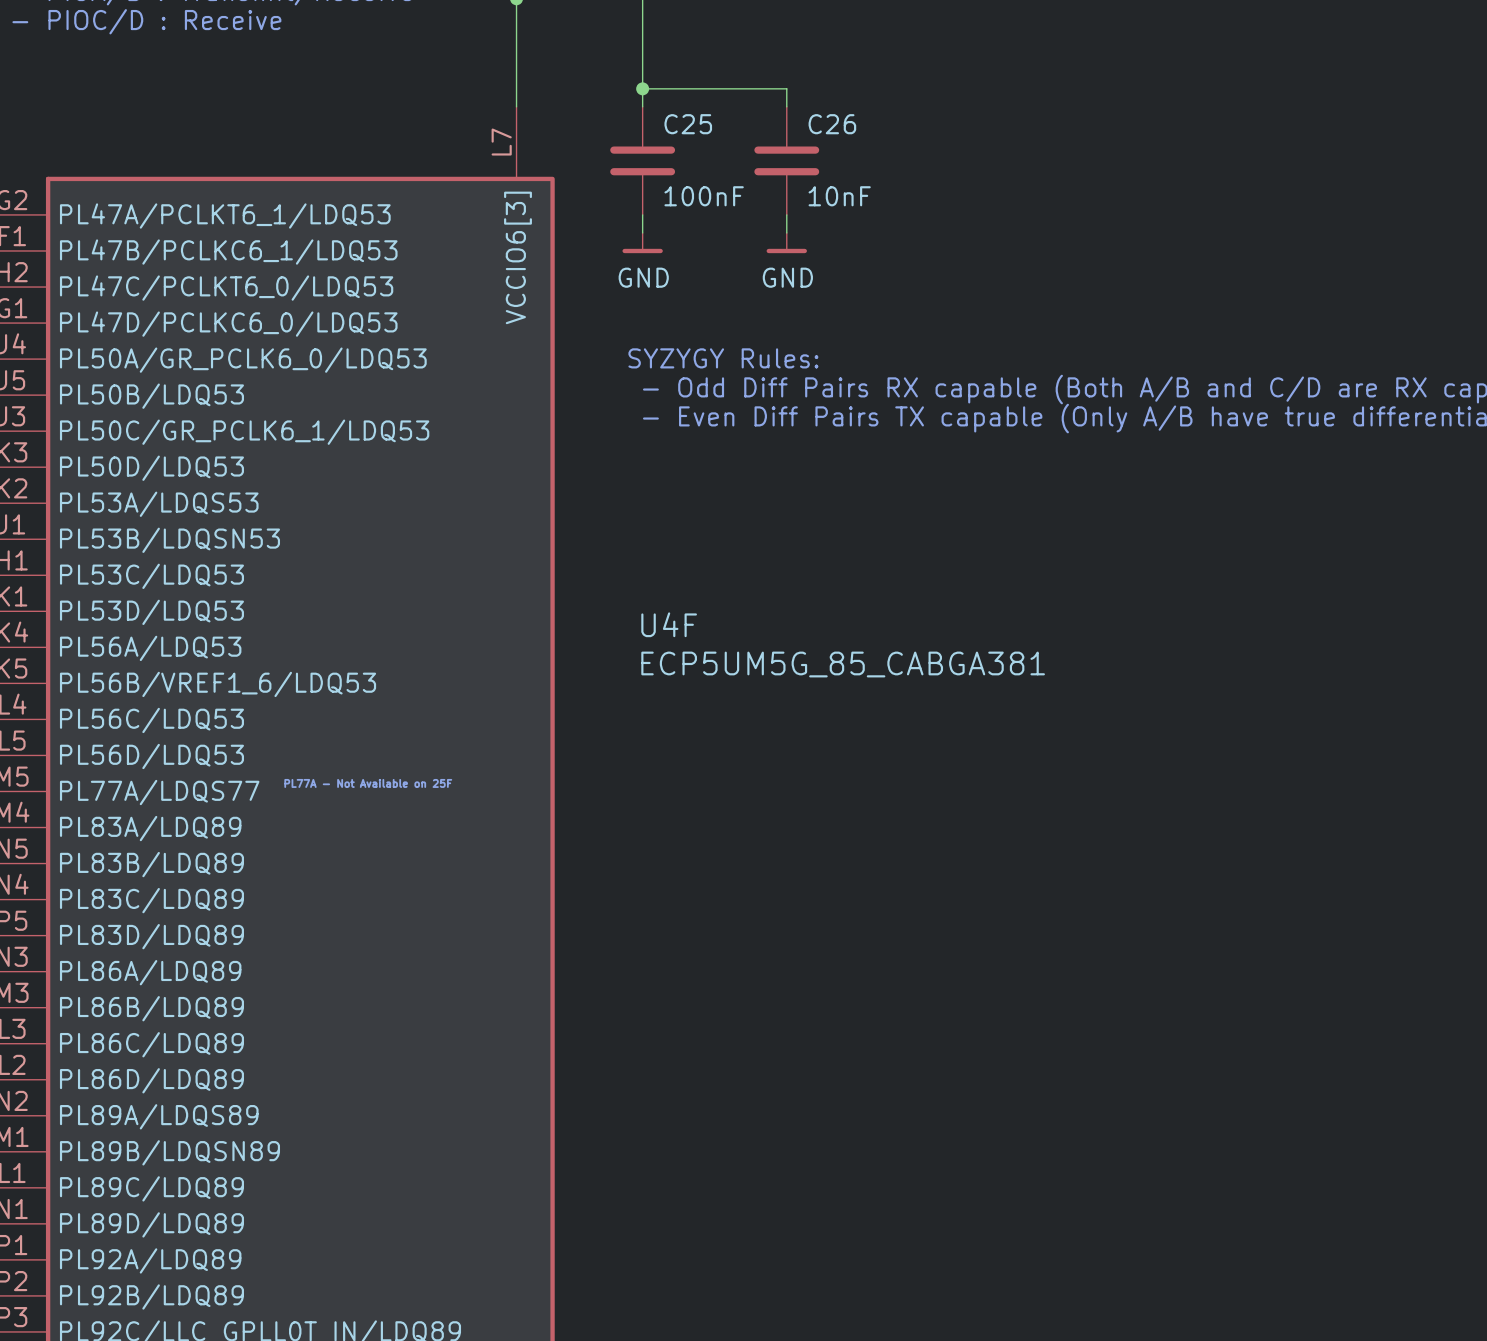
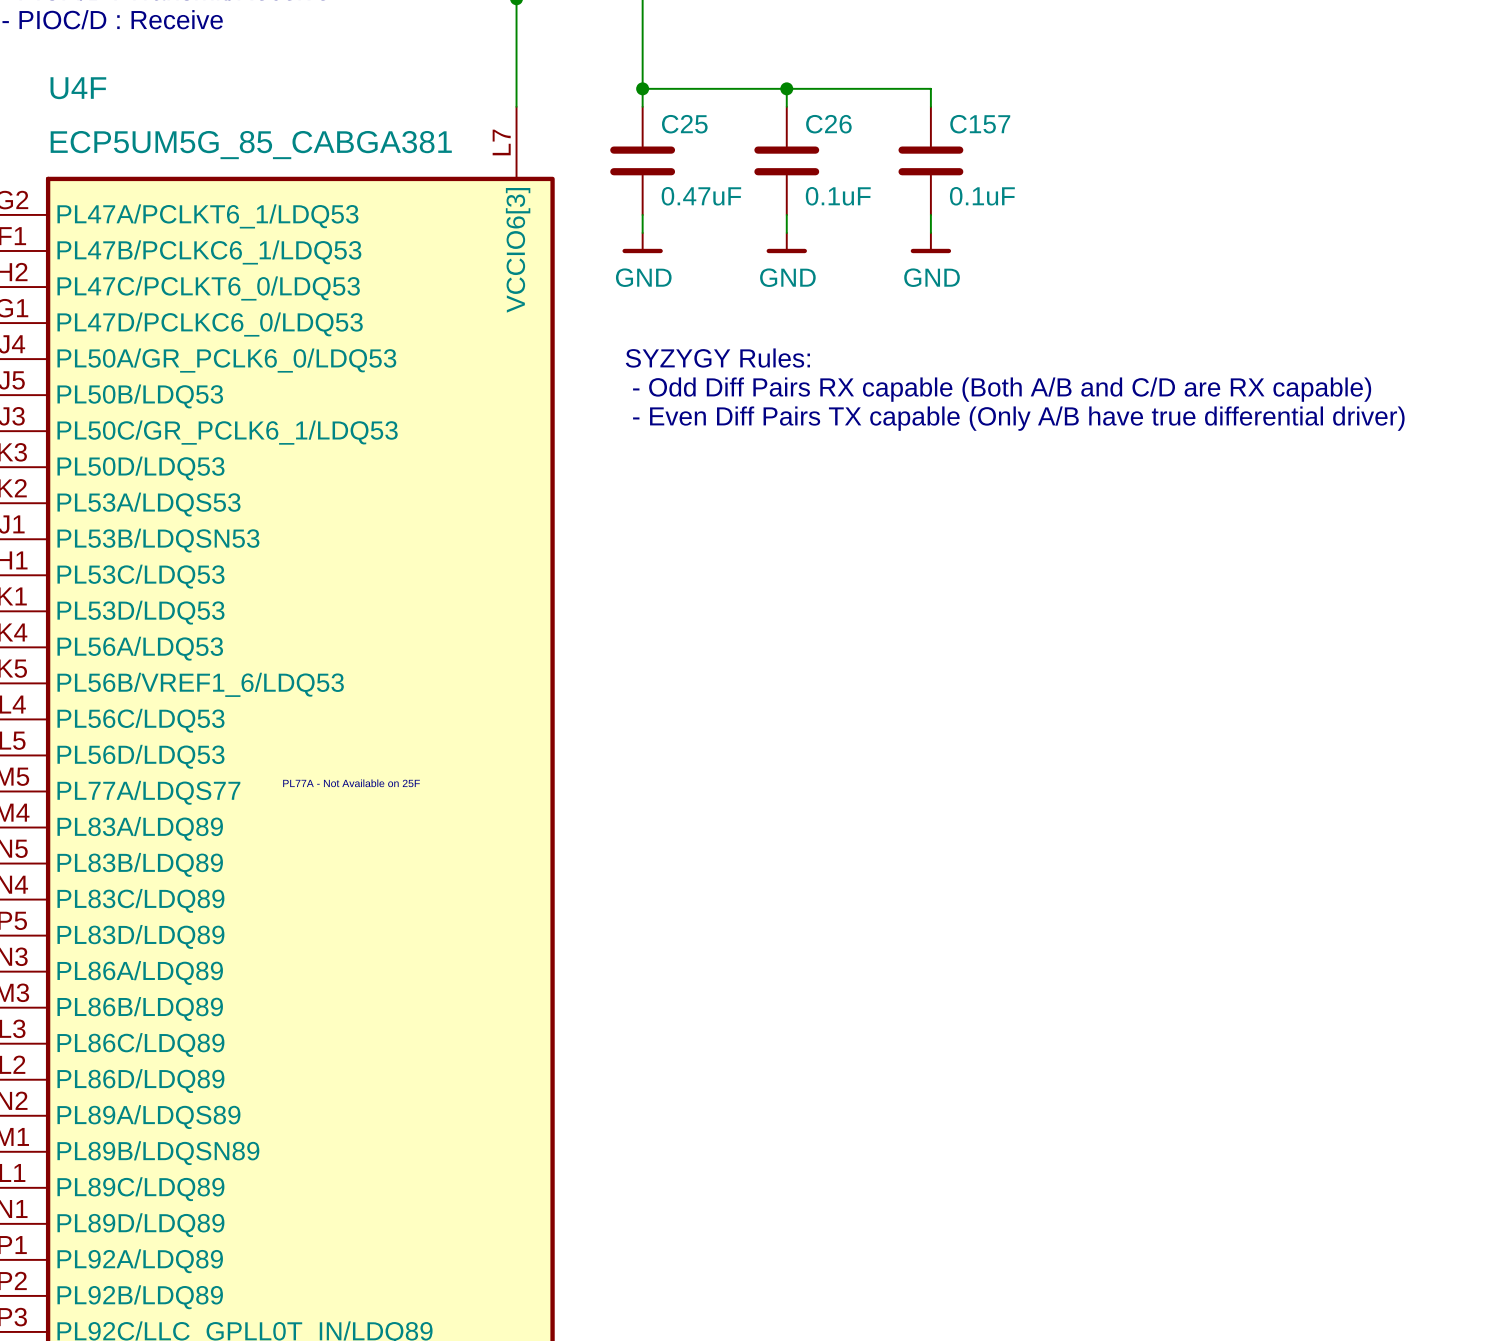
wire: none -> (786, 88) (930, 88) (930, 106)
junction: none -> (786, 88)
C157: none -> 0.1uF (930, 160)
C25 value: 100nF (704, 196) -> 0.47uF (701, 196)
C26 value: 10nF (839, 196) -> 0.1uF (838, 196)
wire: none -> (930, 214) (930, 232)
power symbol: none -> GND (930, 243)
U4F name position: U4F (669, 624) -> U4F (78, 88)
U4F value position: ECP5UM5G_85_CABGA381 (843, 664) -> ECP5UM5G_85_CABGA381 (251, 145)

